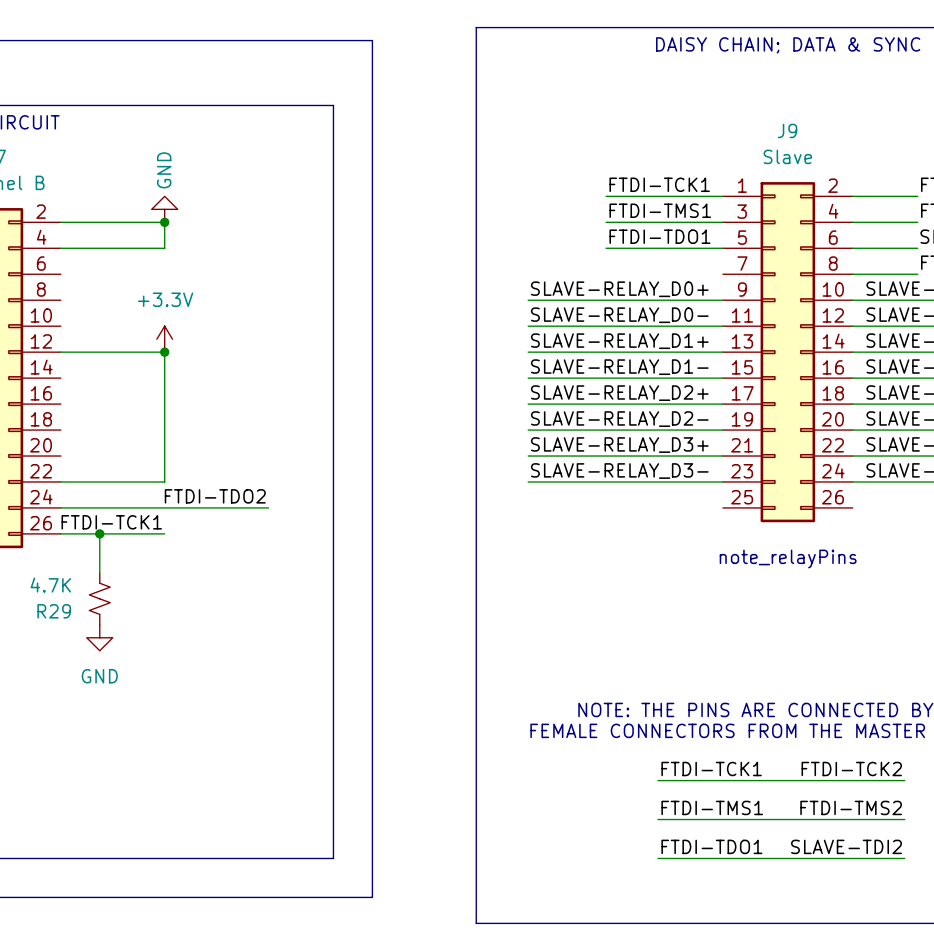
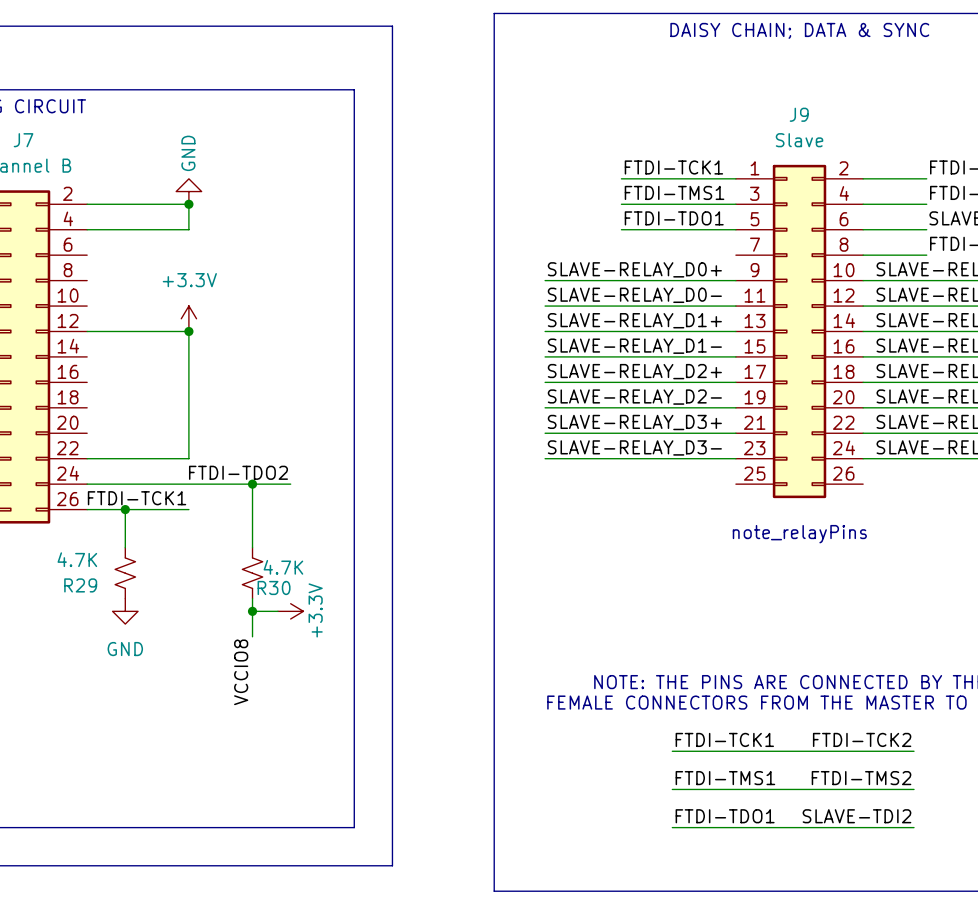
wire: none -> (252, 484) (252, 547)
junction: none -> (252, 484)
R30: none -> 4.7K (252, 573)
wire: none -> (252, 598) (252, 636)
wire: none -> (252, 611) (277, 611)
junction: none -> (252, 611)
power symbol: none -> +3.3V (290, 611)
label: none -> VCCIO8 (241, 672)

